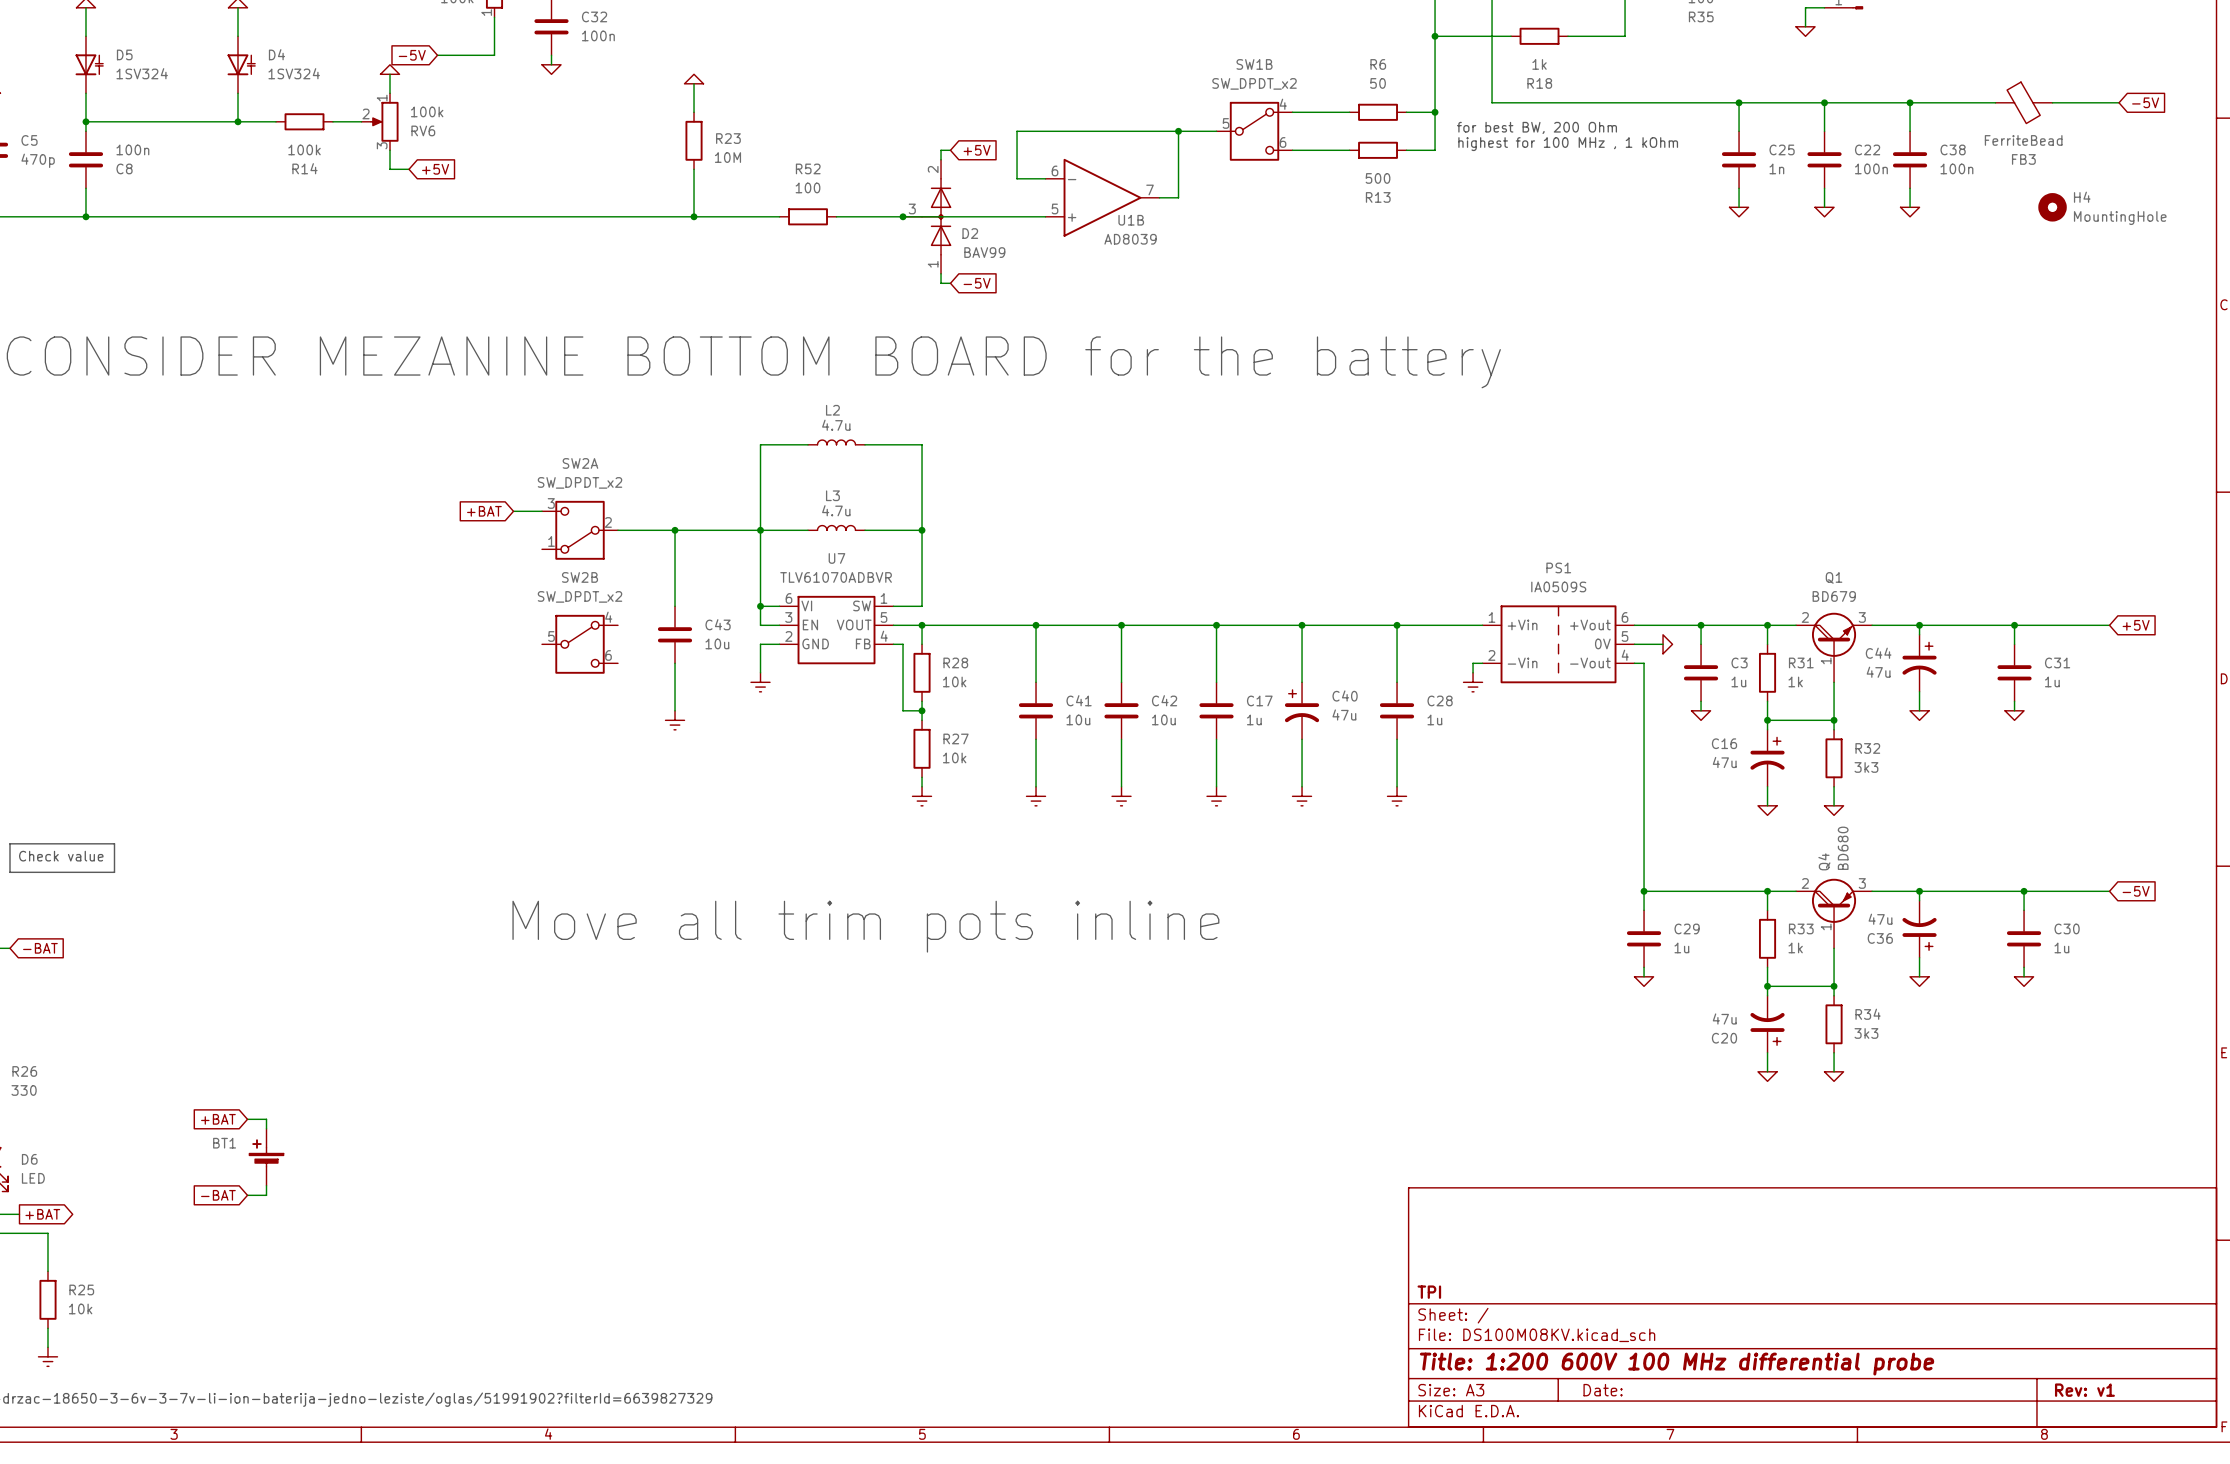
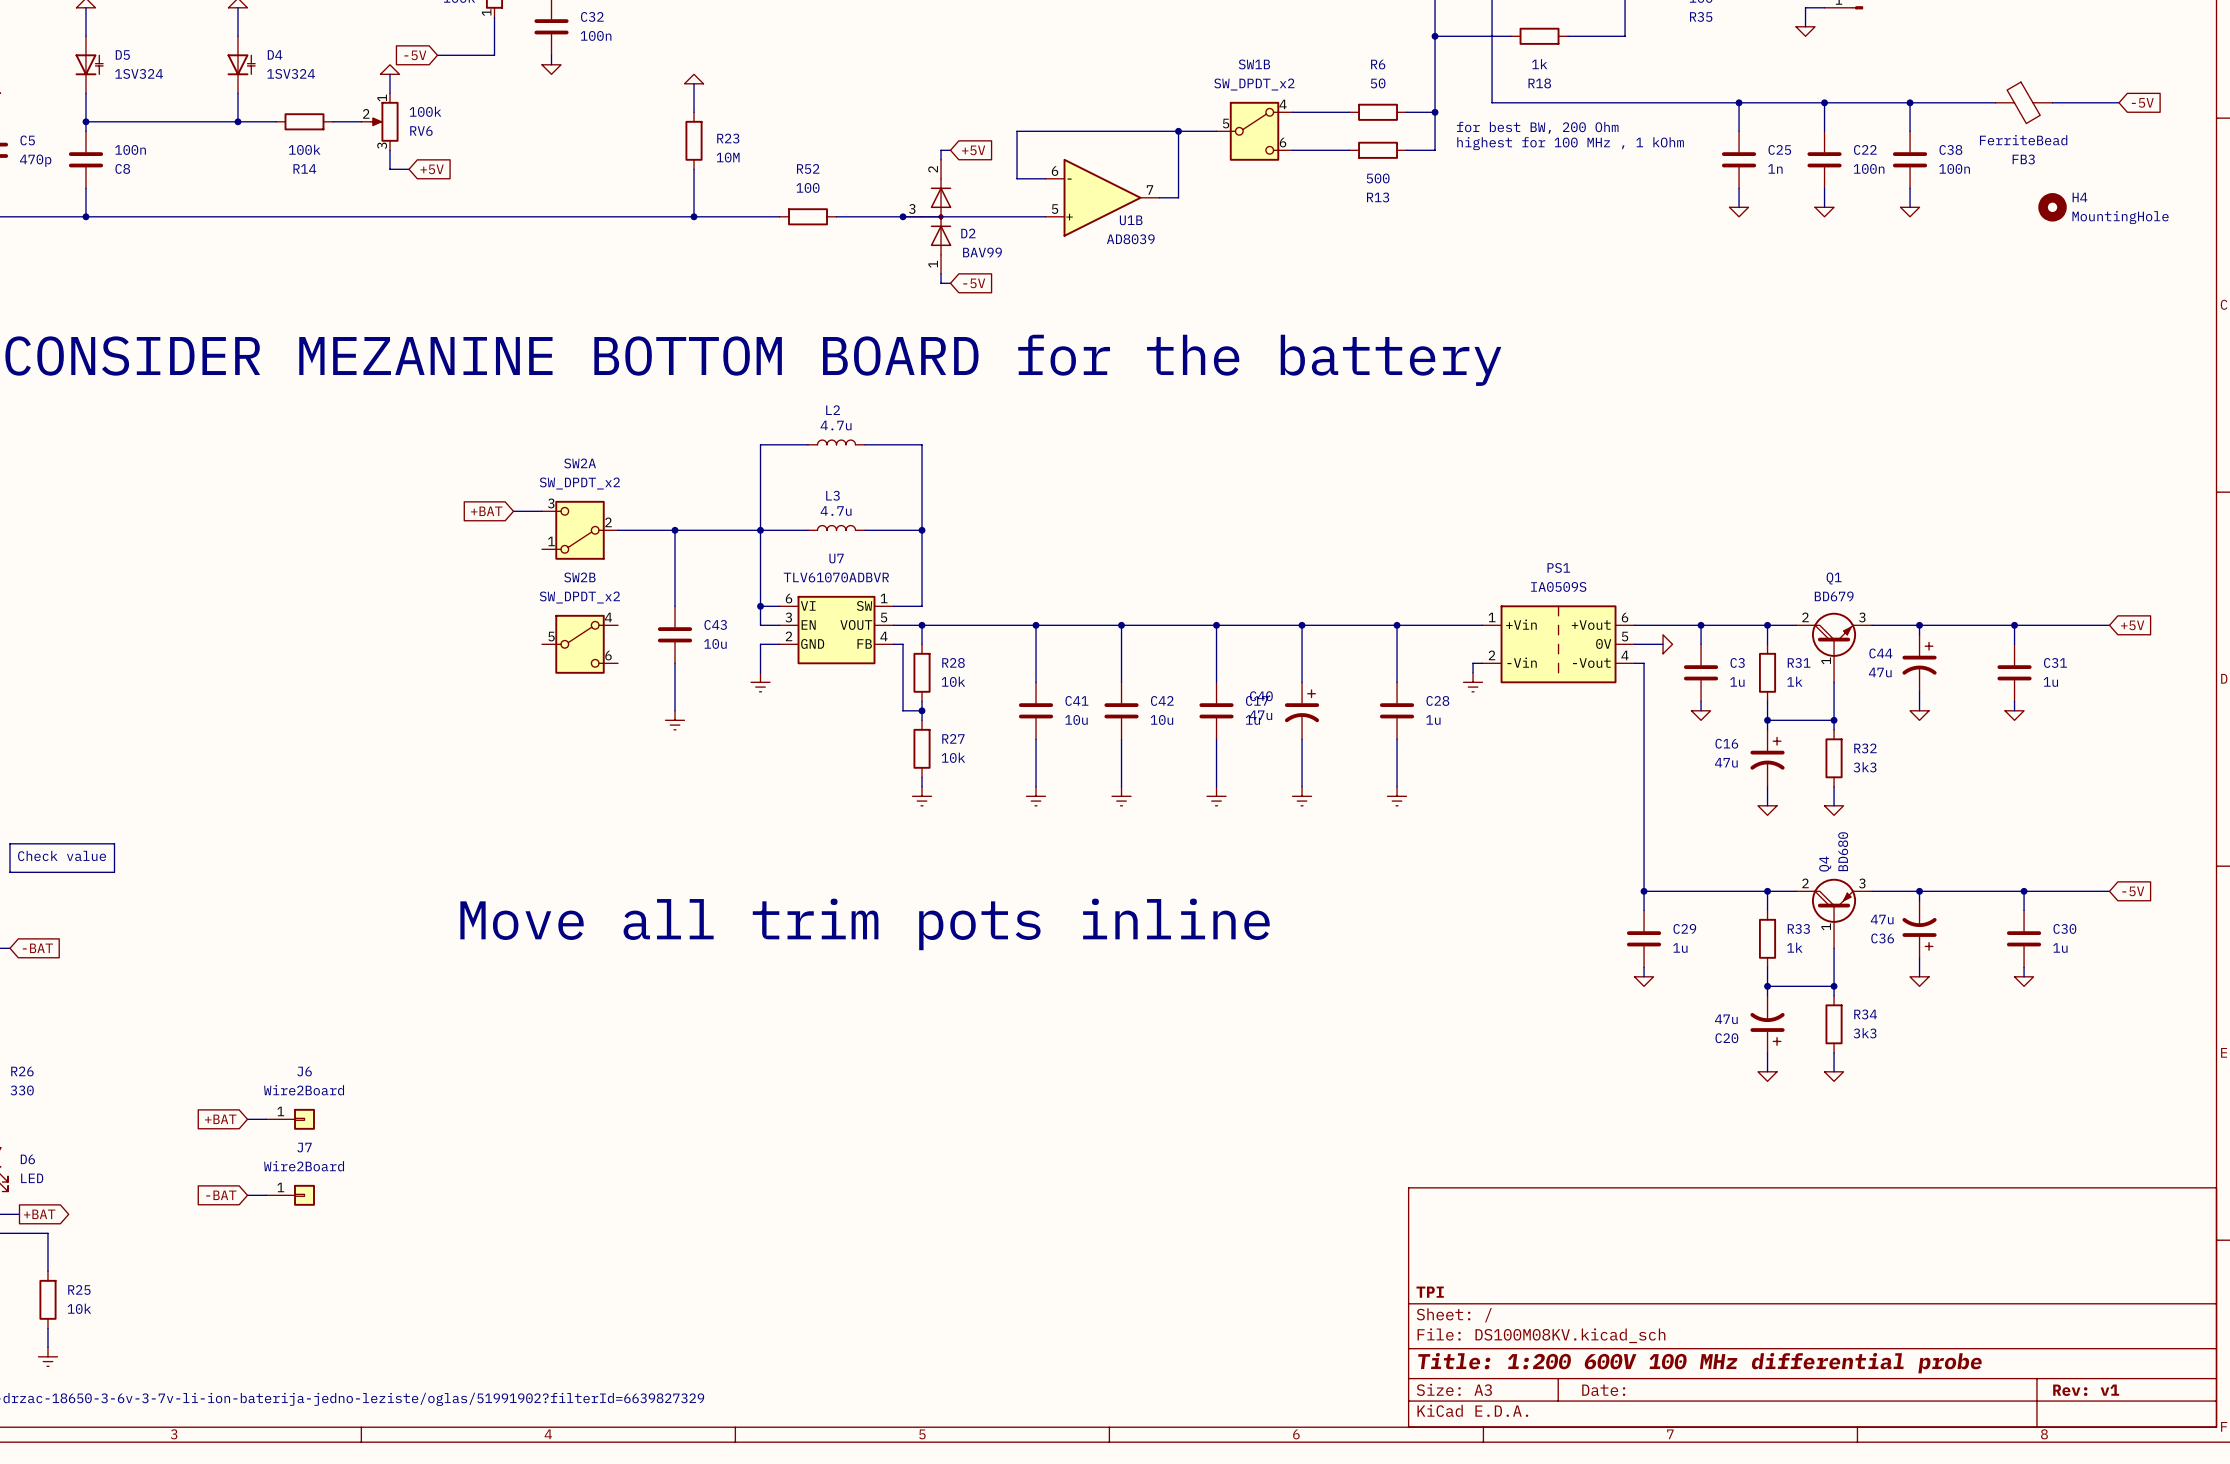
C40 flip: as is (1302, 706) -> left-right (1302, 706)
wire: (266, 1119) (266, 1128) -> none
J6: none -> Wire2Board (290, 1119)
BT1: (266, 1157) -> none
wire: (266, 1185) (266, 1195) -> none
J7: none -> Wire2Board (290, 1195)

